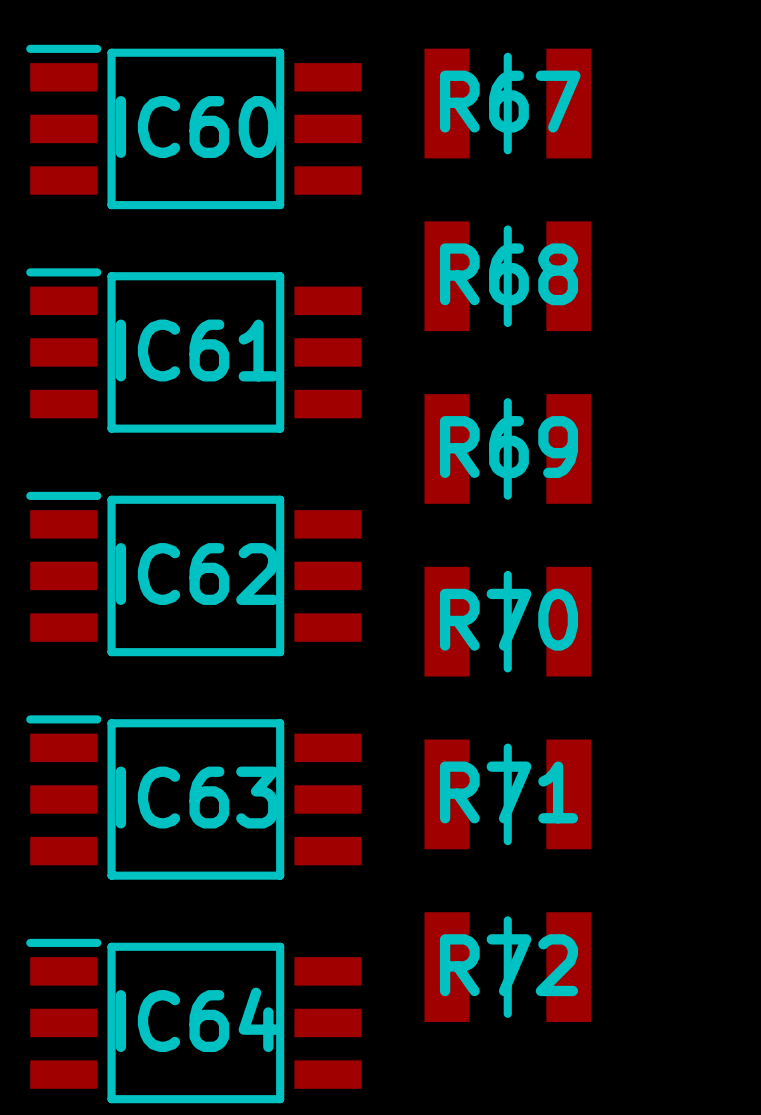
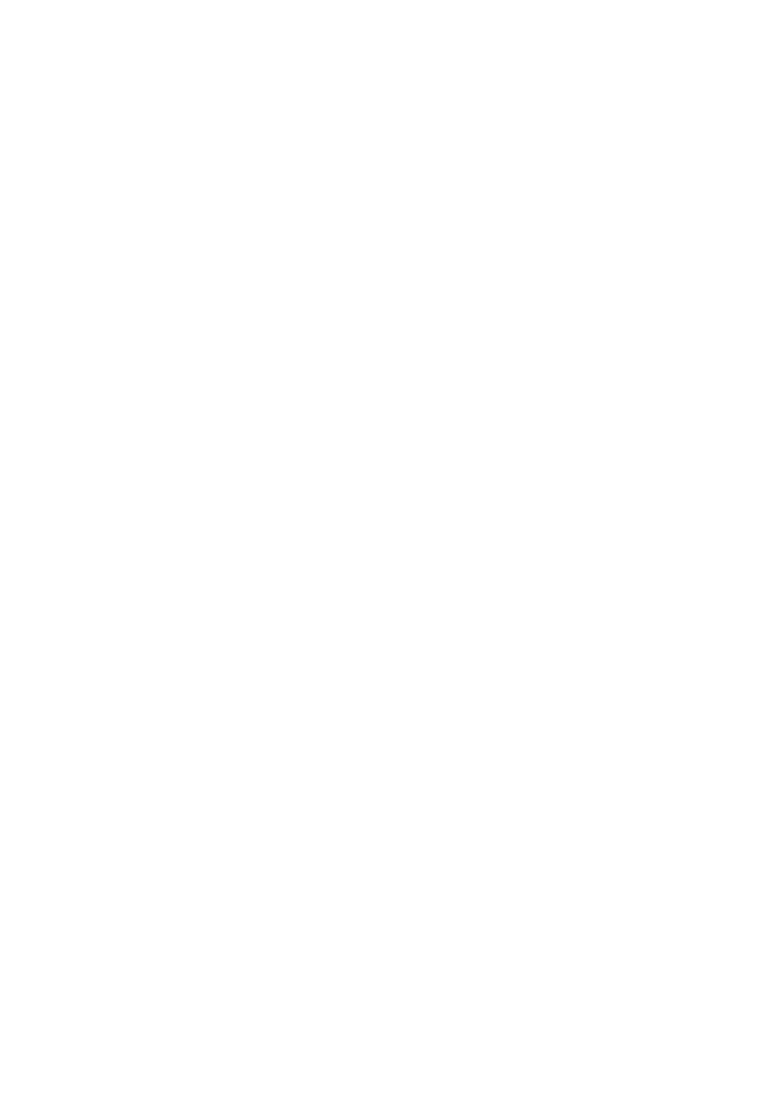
R67: (507, 103) -> none
IC60: (193, 126) -> none
R68: (507, 276) -> none
IC61: (193, 350) -> none
R69: (507, 448) -> none
IC62: (193, 574) -> none
R70: (507, 621) -> none
R71: (507, 794) -> none
IC63: (193, 797) -> none
R72: (507, 967) -> none
IC64: (193, 1021) -> none

